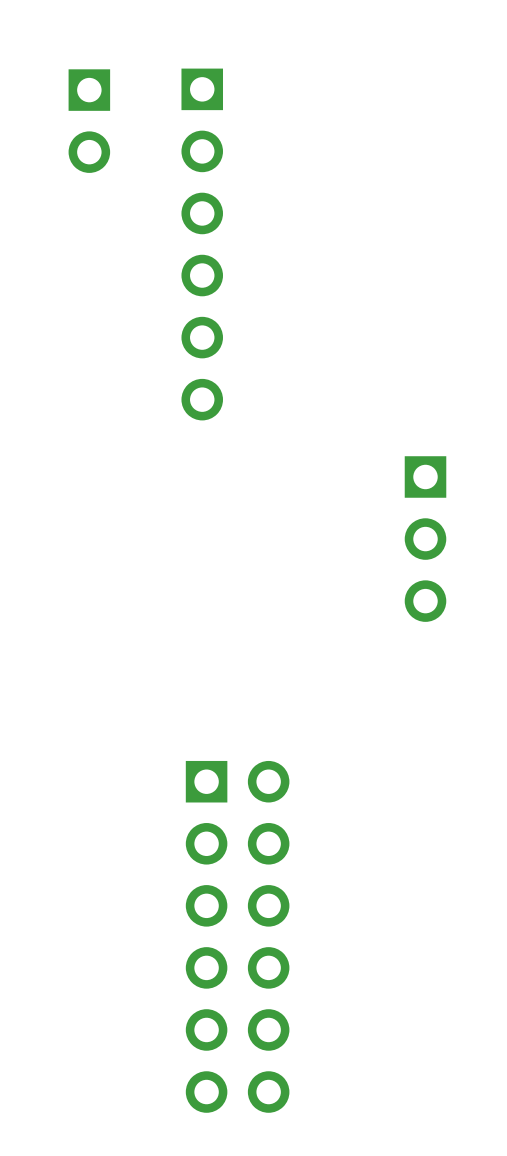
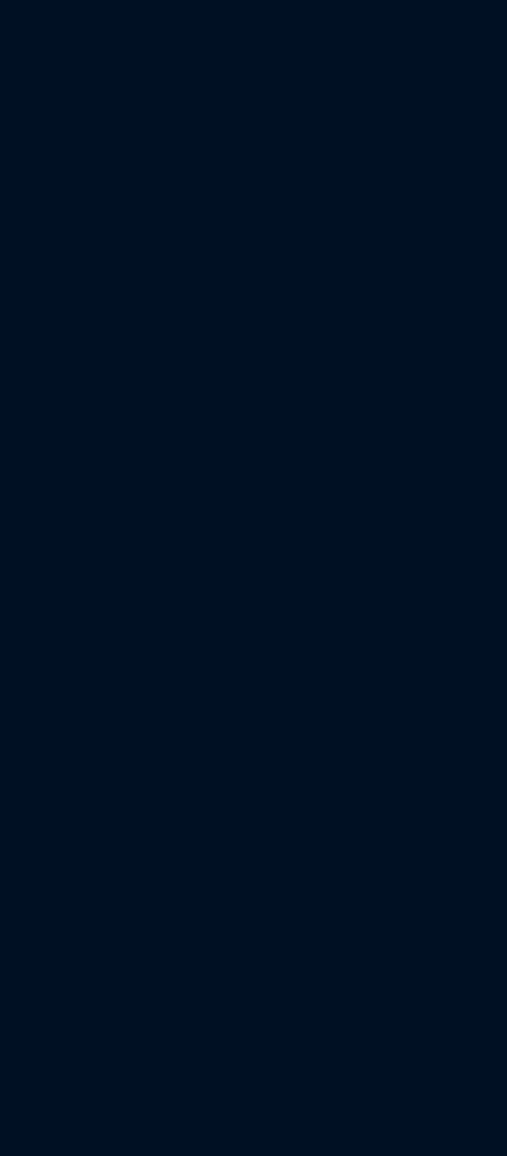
part: (89, 121) -> none
part: (202, 244) -> none
part: (425, 539) -> none
part: (237, 936) -> none

